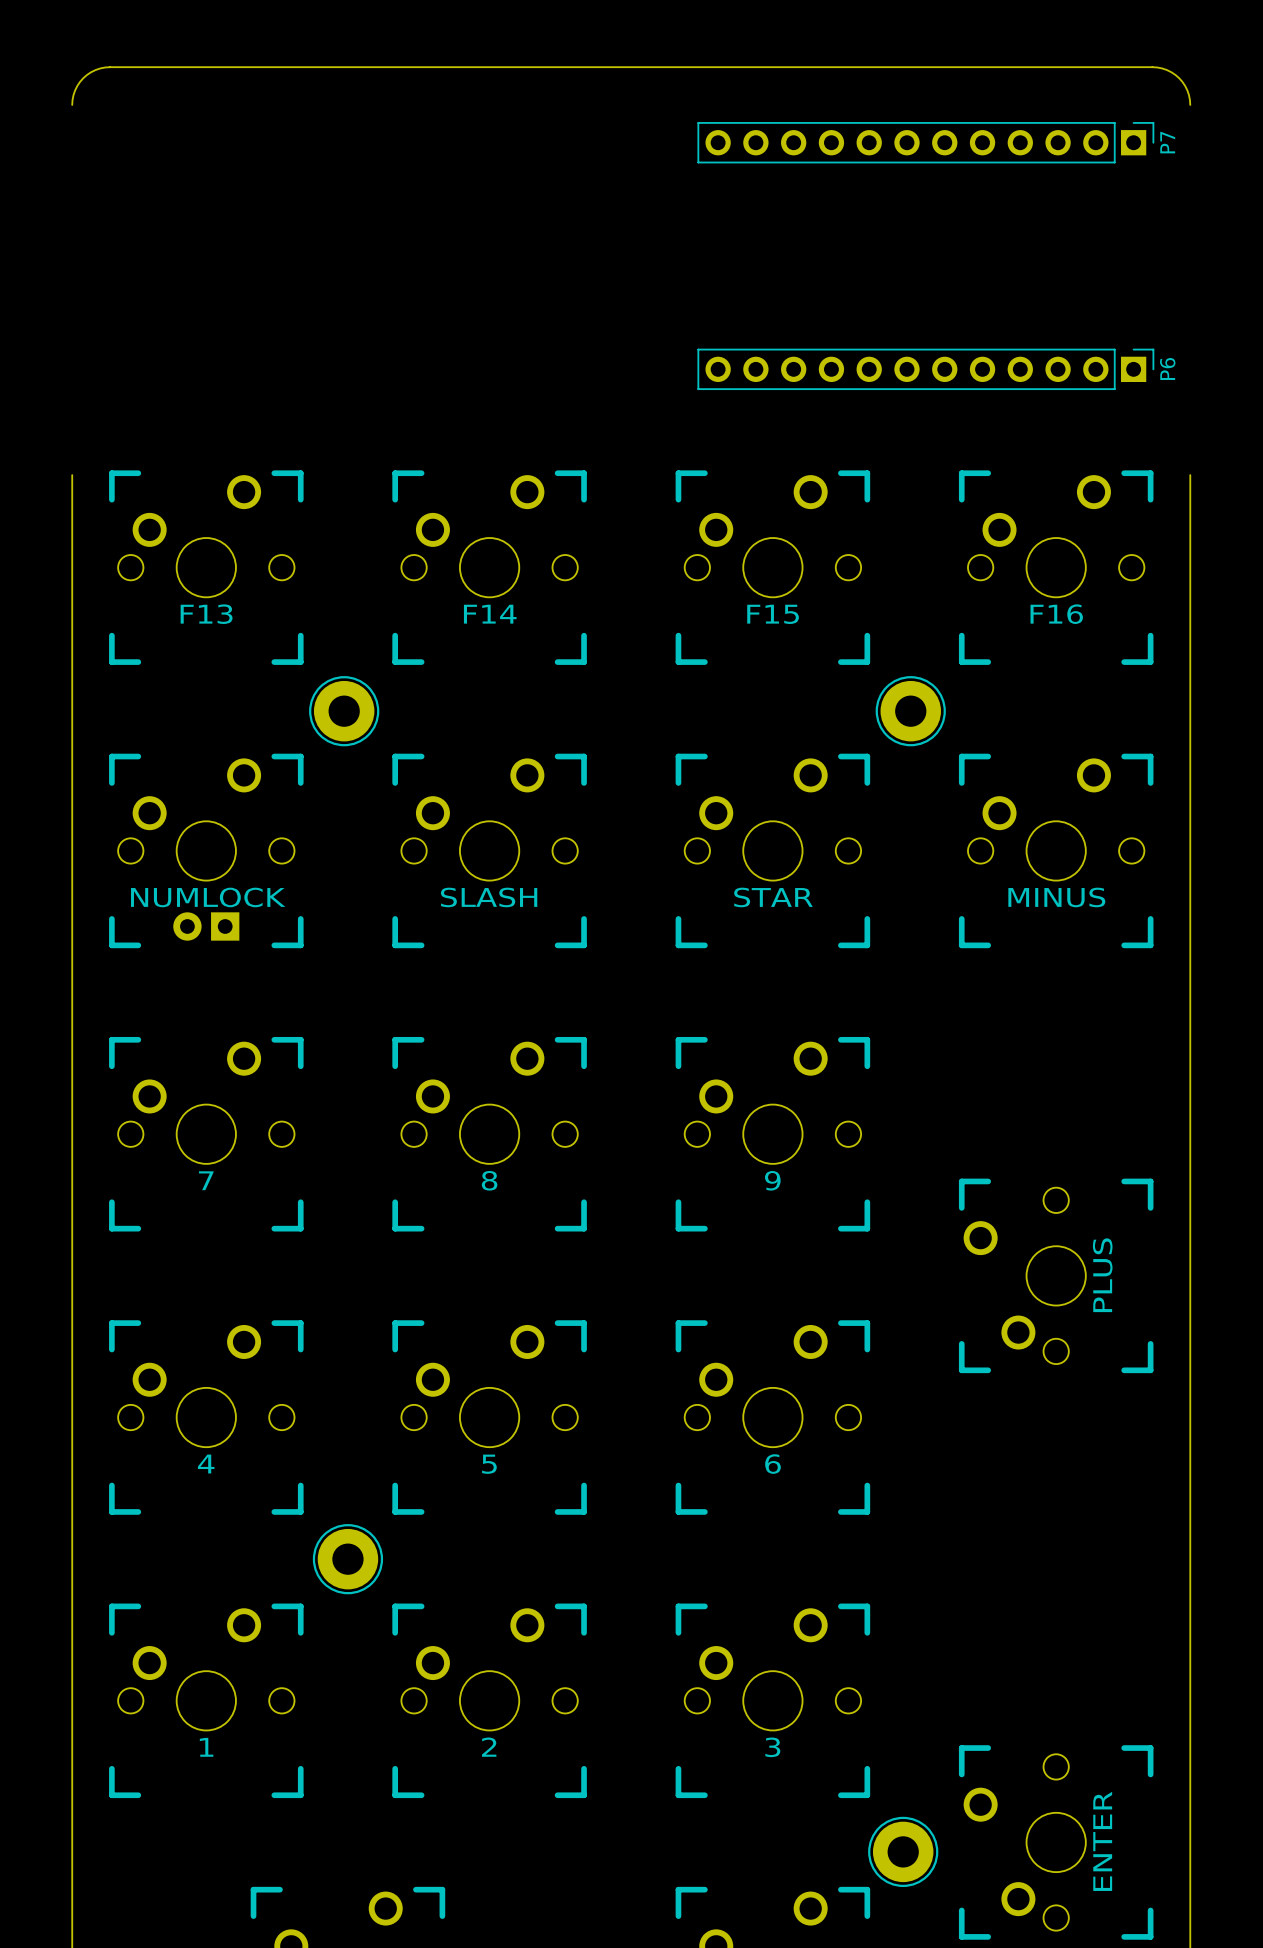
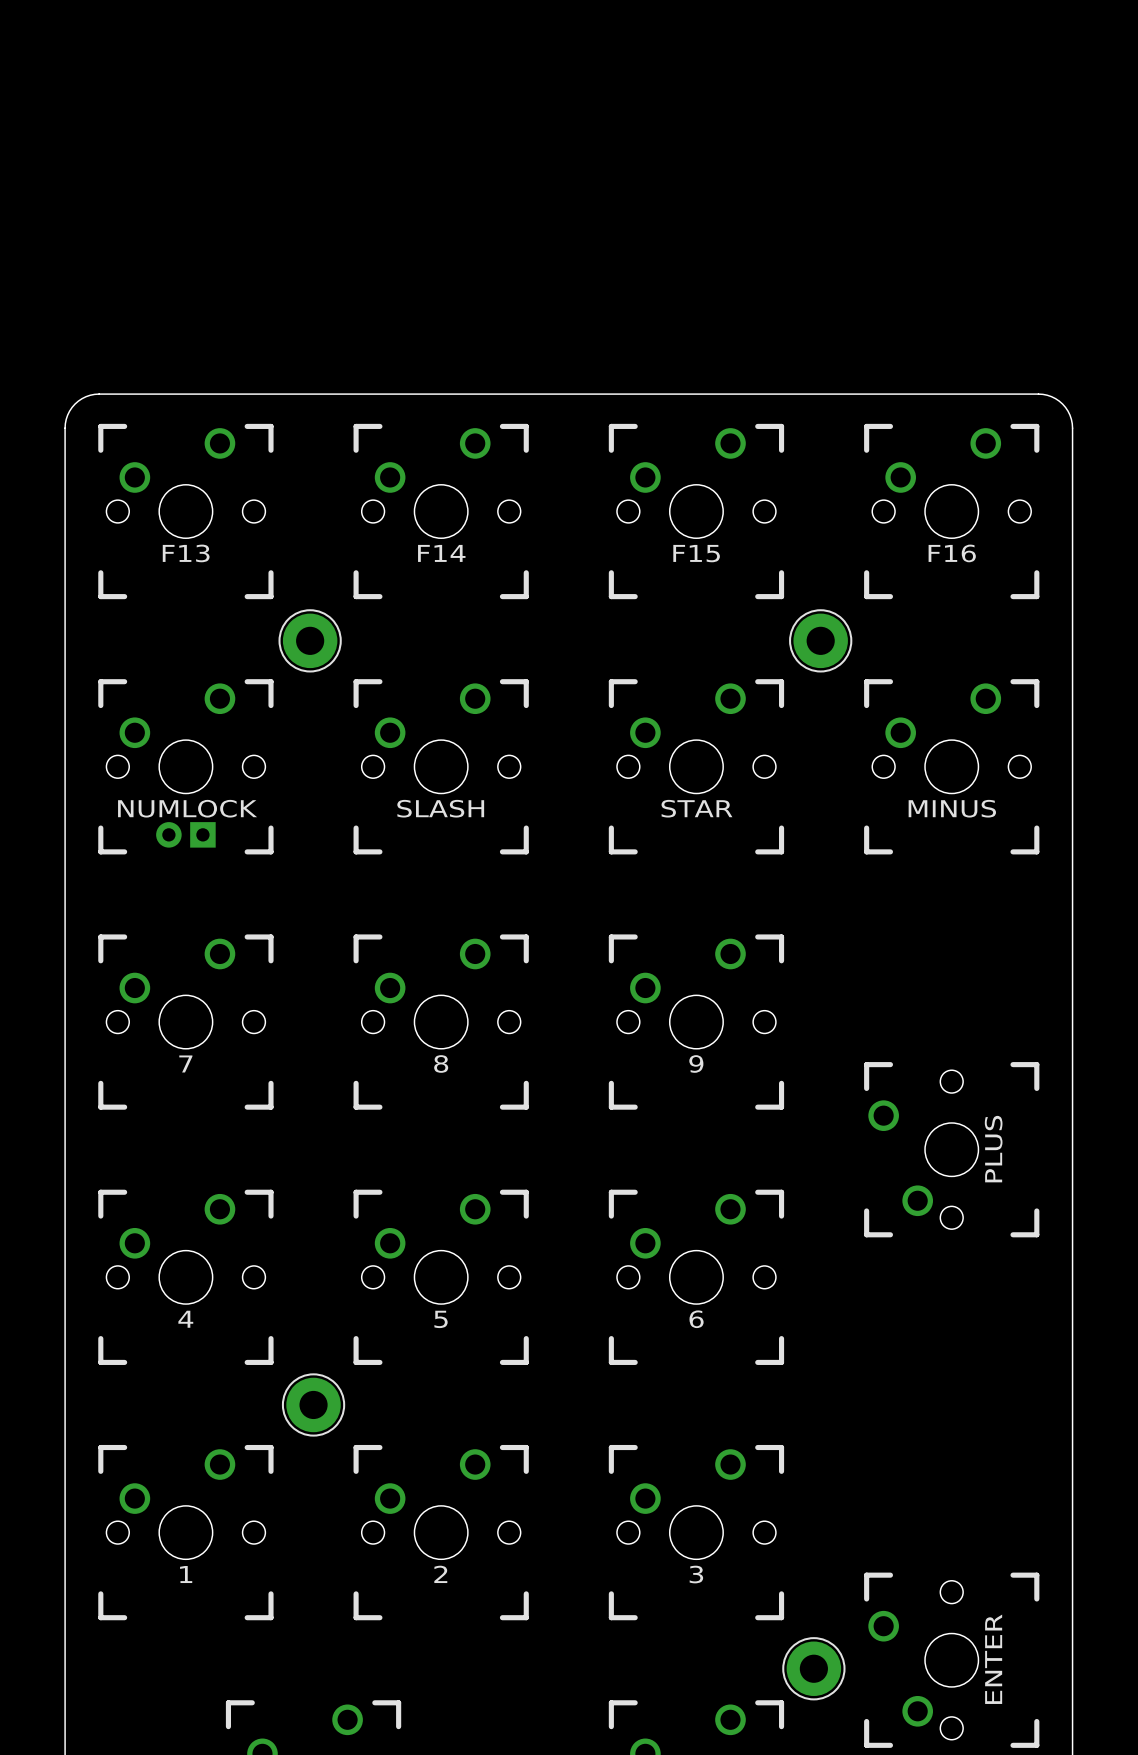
board edge: (72, 104) (75, 90) (83, 78) (95, 70) (109, 67) (1152, 67) (1166, 70) (1179, 78) (1187, 90) (1190, 104) -> (65, 428) (67, 415) (75, 404) (86, 396) (99, 394) (1038, 394) (1051, 396) (1062, 404) (1069, 415) (1072, 428)
P7: (925, 142) -> none
P6: (925, 369) -> none

